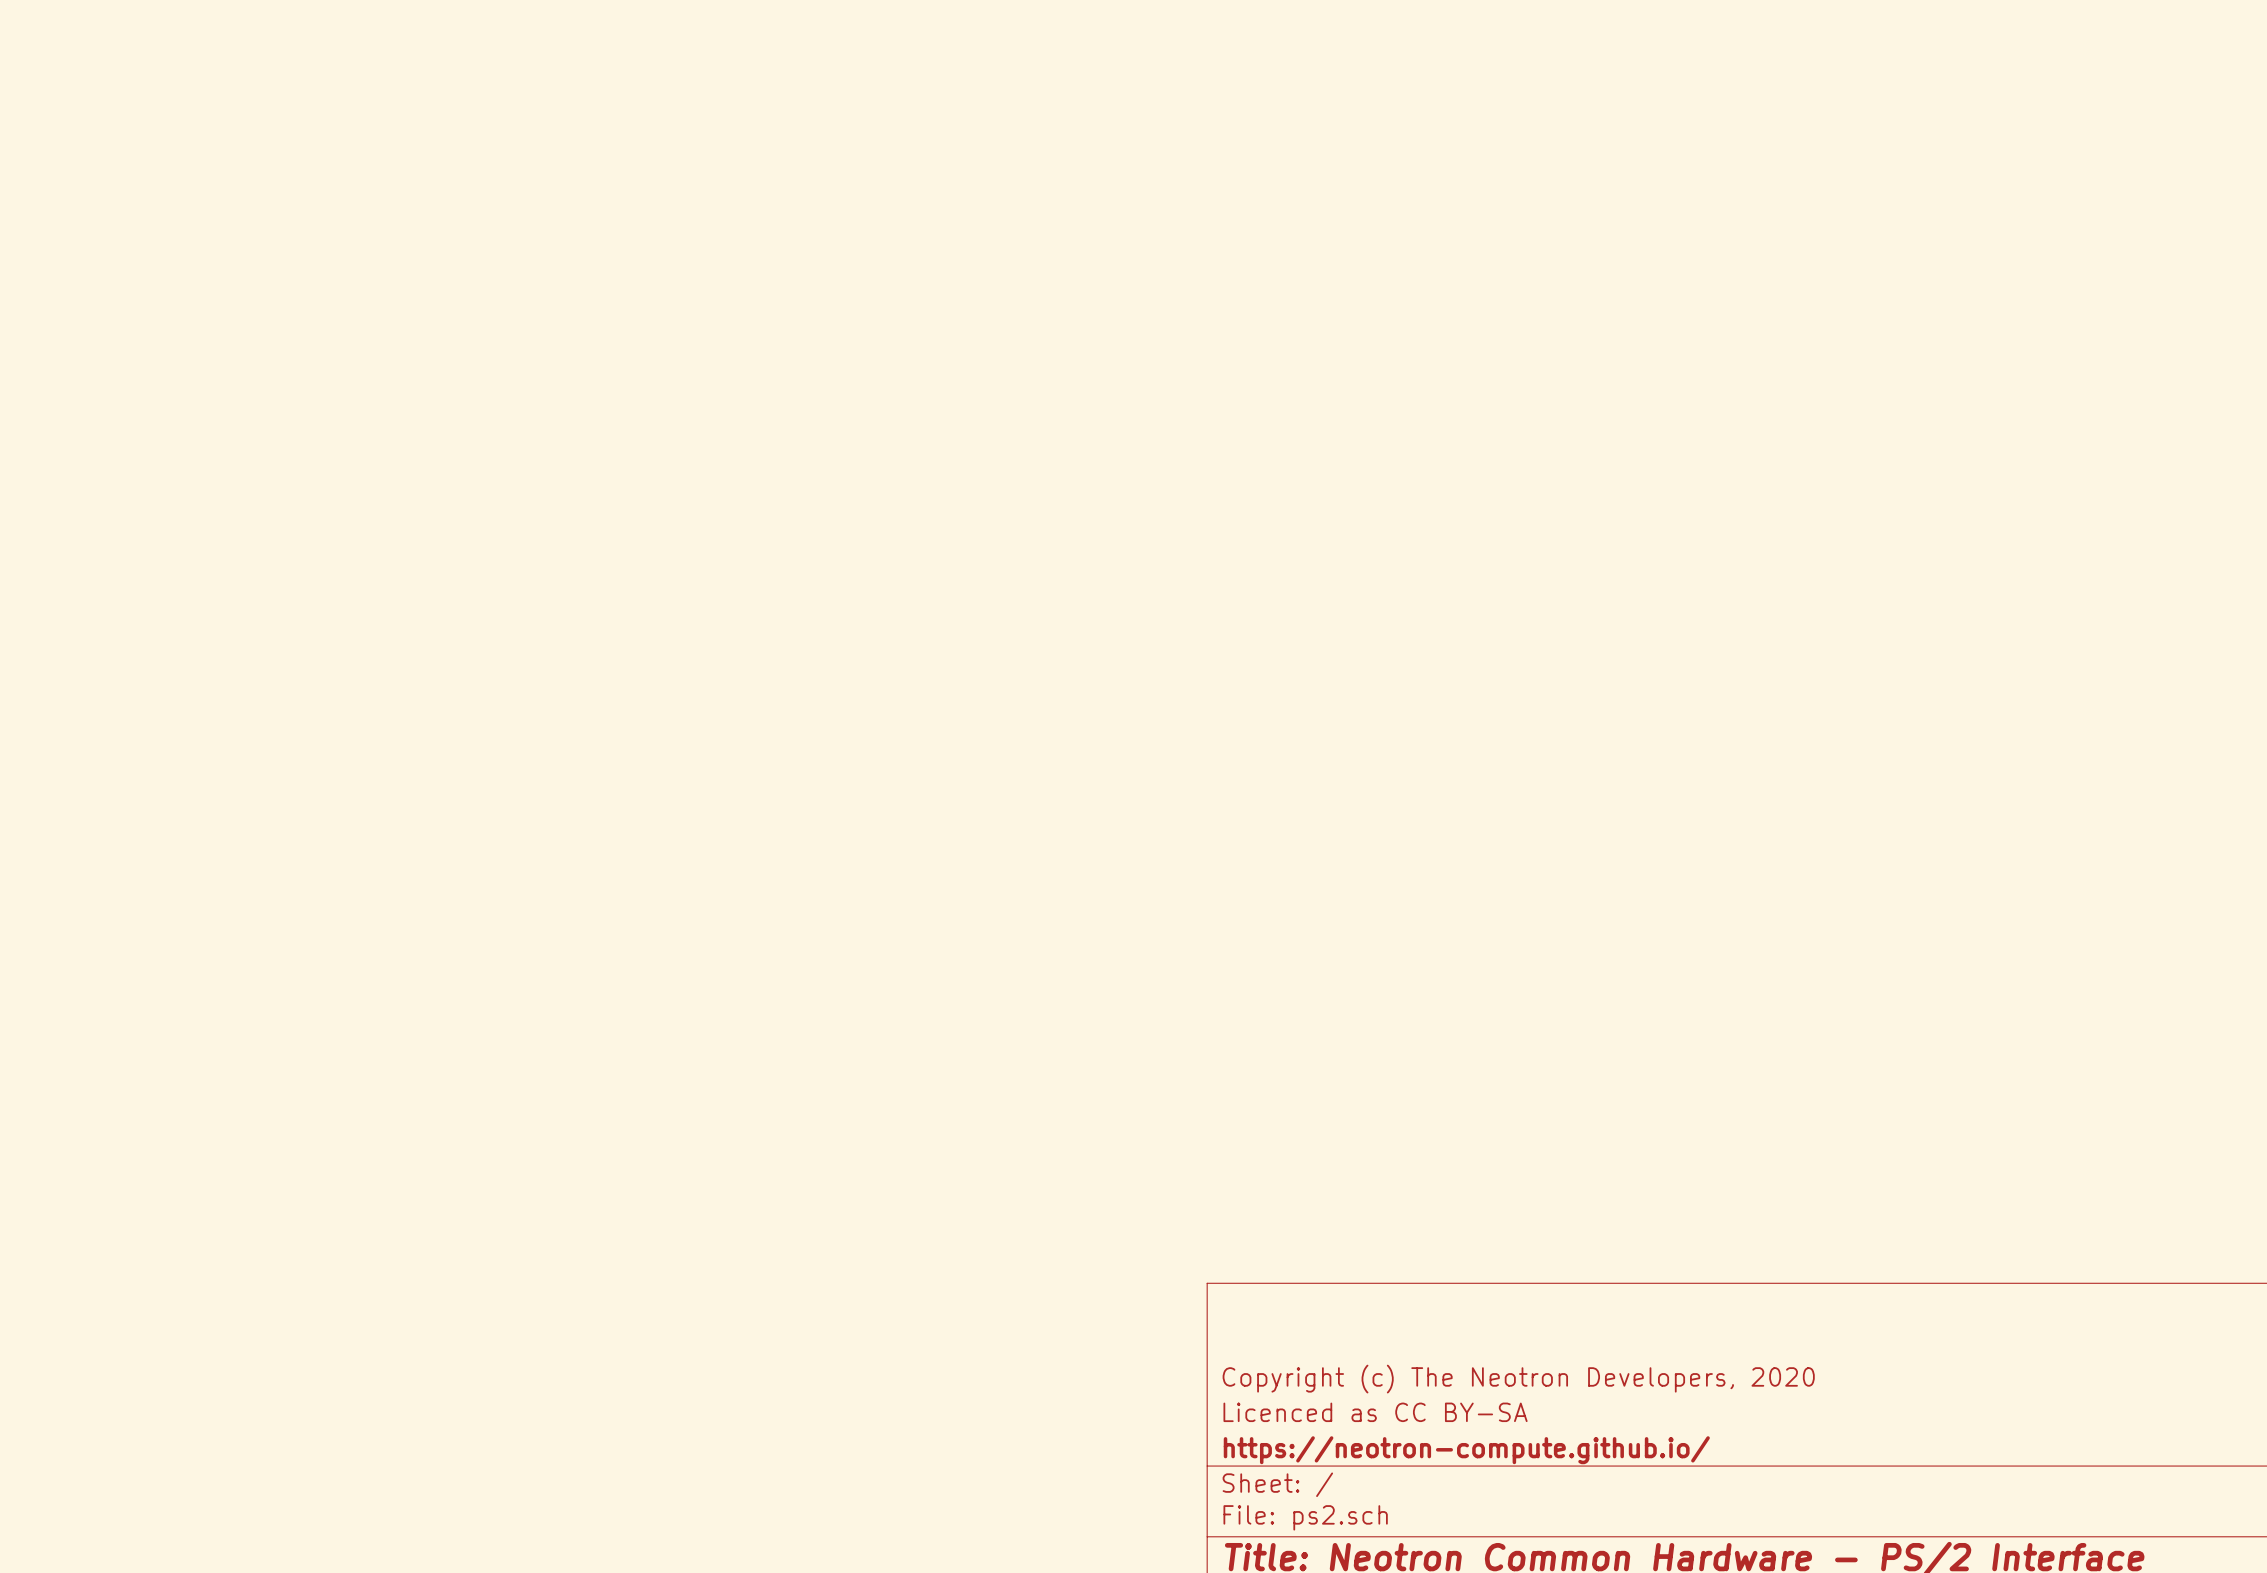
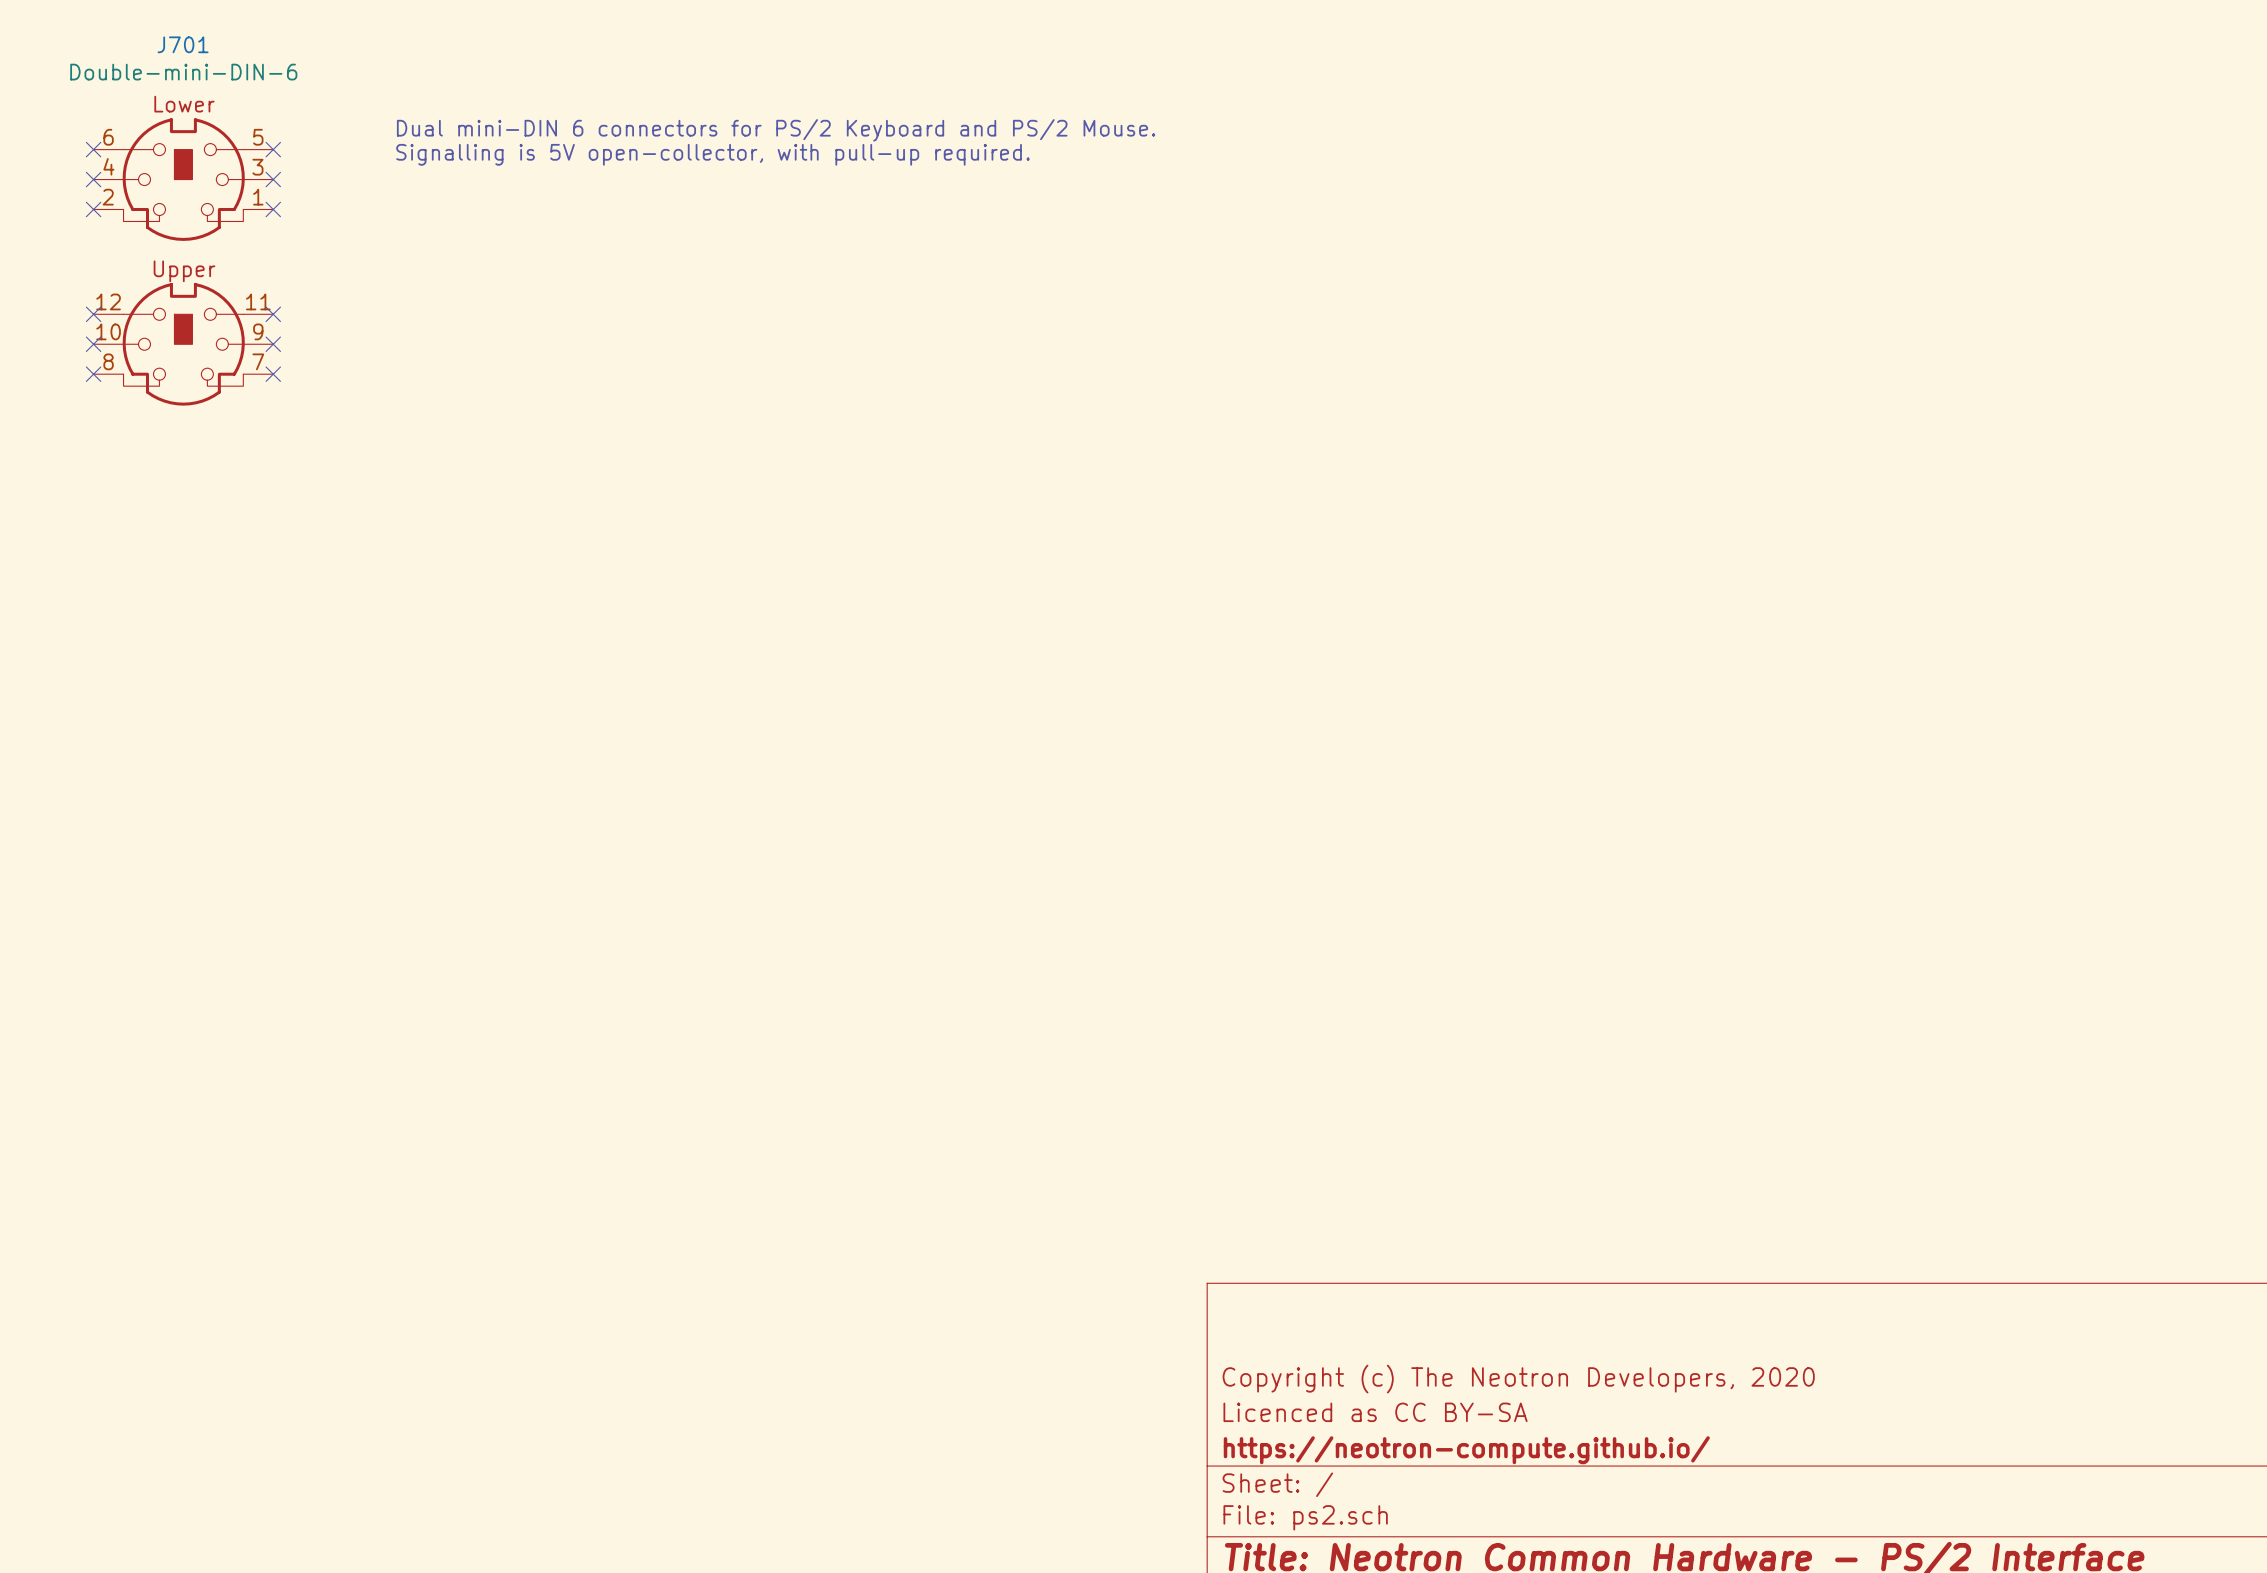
text: none -> Dual mini-DIN 6 connectors for PS/2 Keyboard and PS/2 Mouse. (776, 130)
no-connect mark: none -> (93, 149)
no-connect mark: none -> (273, 149)
text: none -> Signalling is 5V open-collector, with pull-up required. (712, 154)
no-connect mark: none -> (93, 179)
no-connect mark: none -> (273, 179)
no-connect mark: none -> (93, 209)
no-connect mark: none -> (273, 209)
J701: none -> Double-mini-DIN-6 (183, 261)
no-connect mark: none -> (93, 314)
no-connect mark: none -> (273, 314)
no-connect mark: none -> (93, 344)
no-connect mark: none -> (273, 344)
no-connect mark: none -> (93, 374)
no-connect mark: none -> (273, 374)

